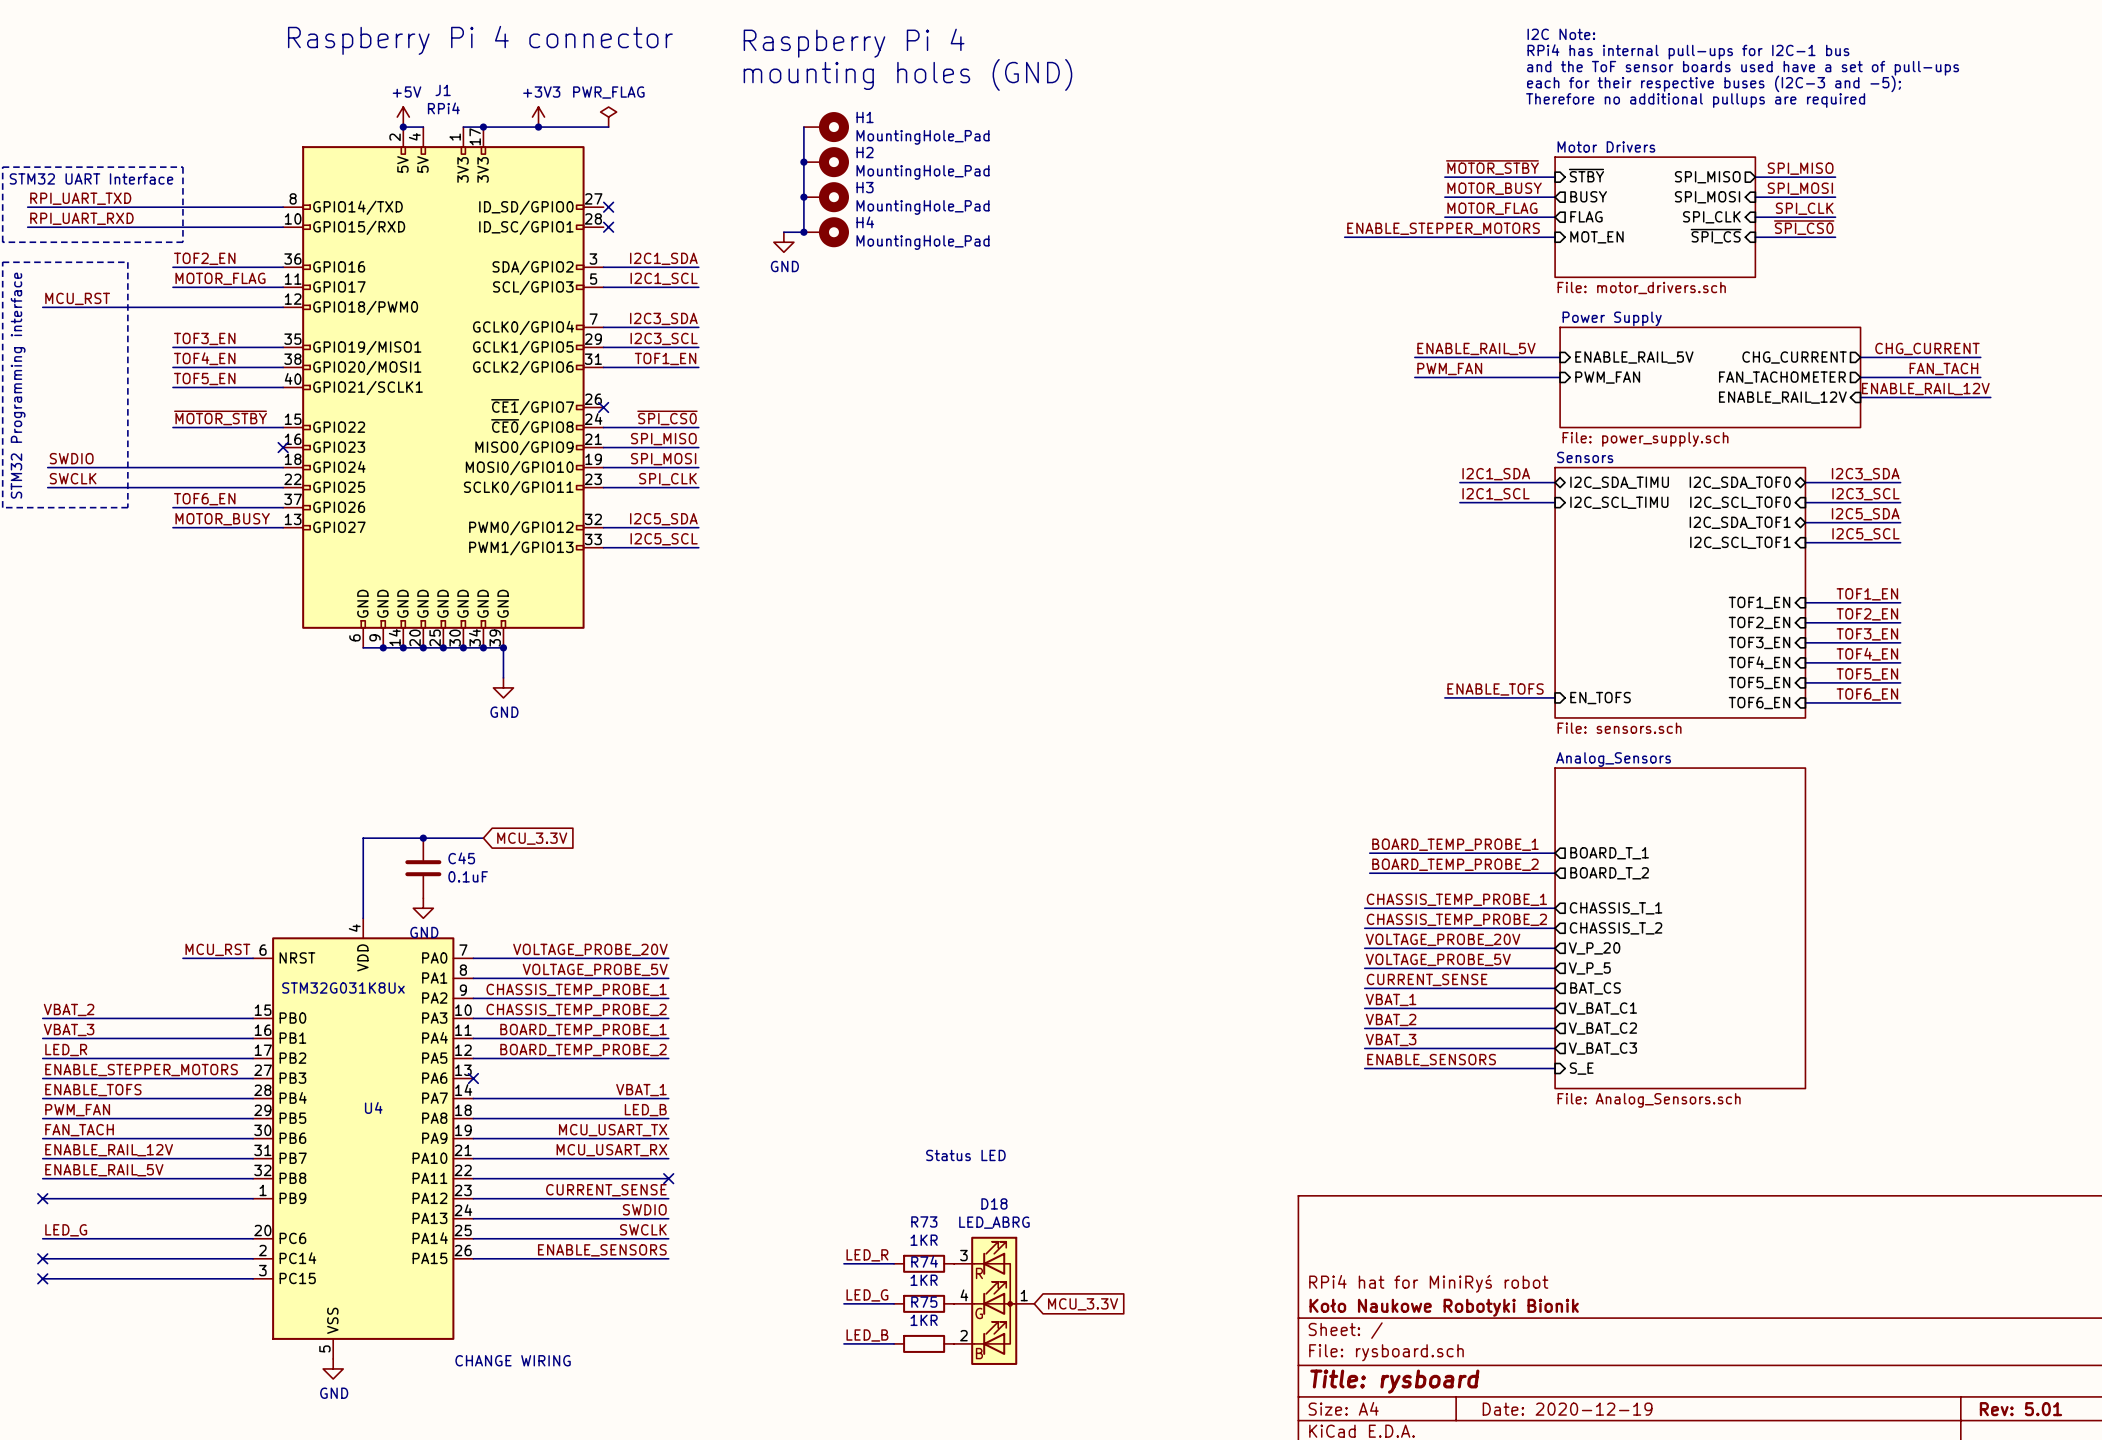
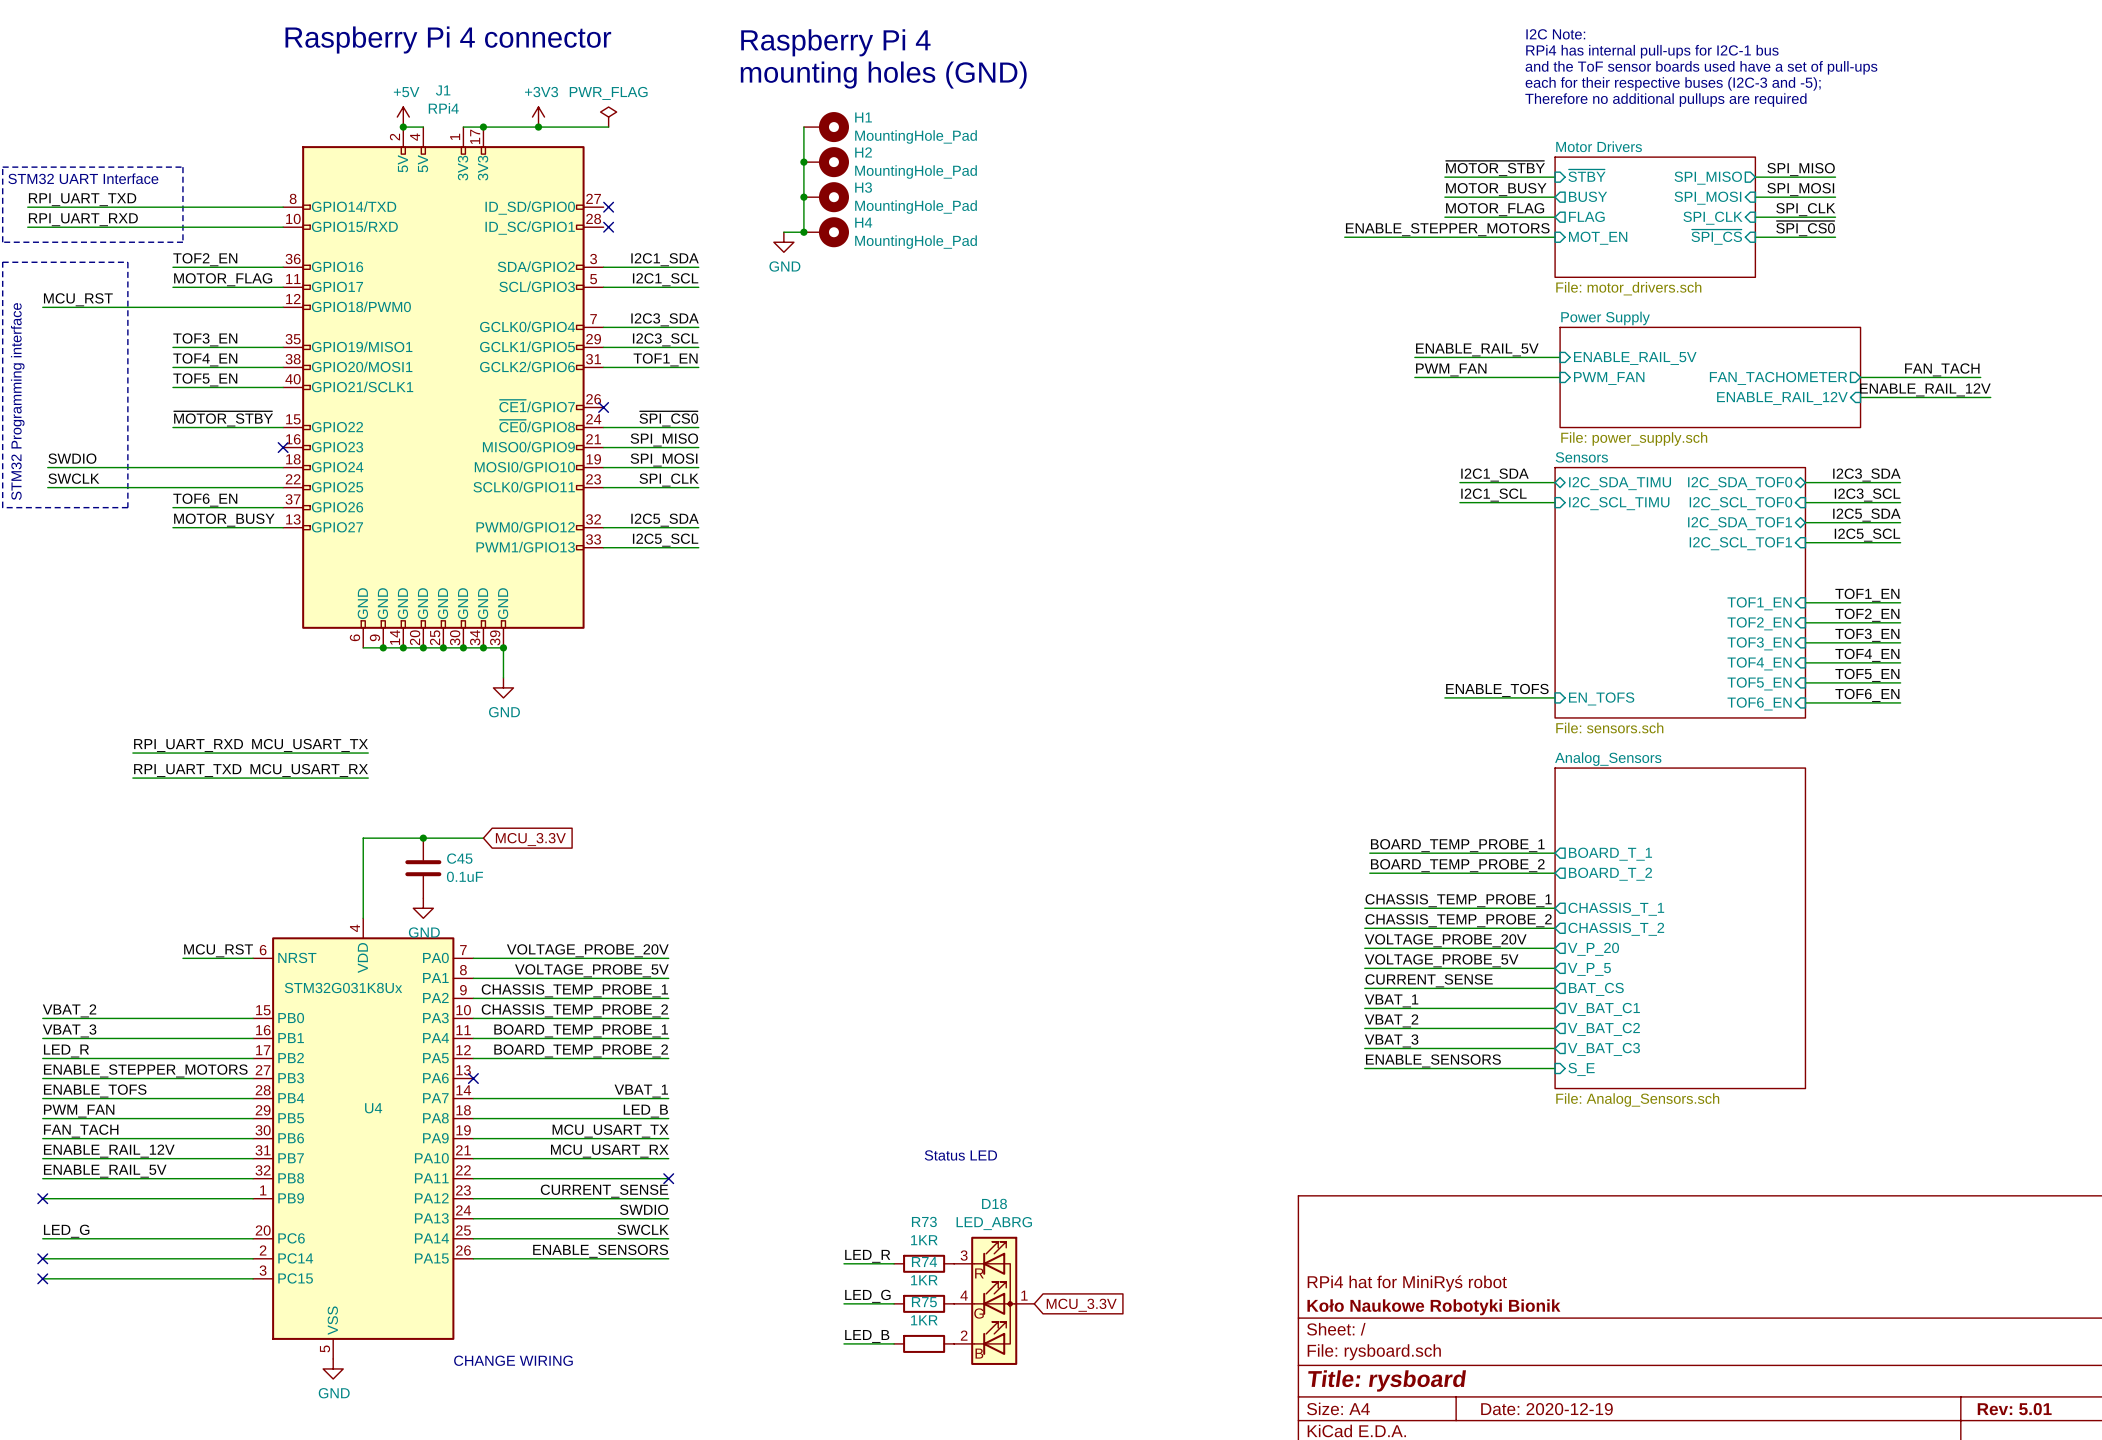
label: CHG_CURRENT (1927, 348) -> none
sheet pin: CHG_CURRENT (1794, 357) -> none
wire: (1860, 357) (1980, 357) -> none
label: none -> RPI_UART_RXD (188, 745)
label: none -> MCU_USART_TX (310, 745)
wire: none -> (132, 753) (368, 753)
label: none -> RPI_UART_TXD (187, 770)
label: none -> MCU_USART_RX (309, 770)
wire: none -> (132, 778) (368, 778)

